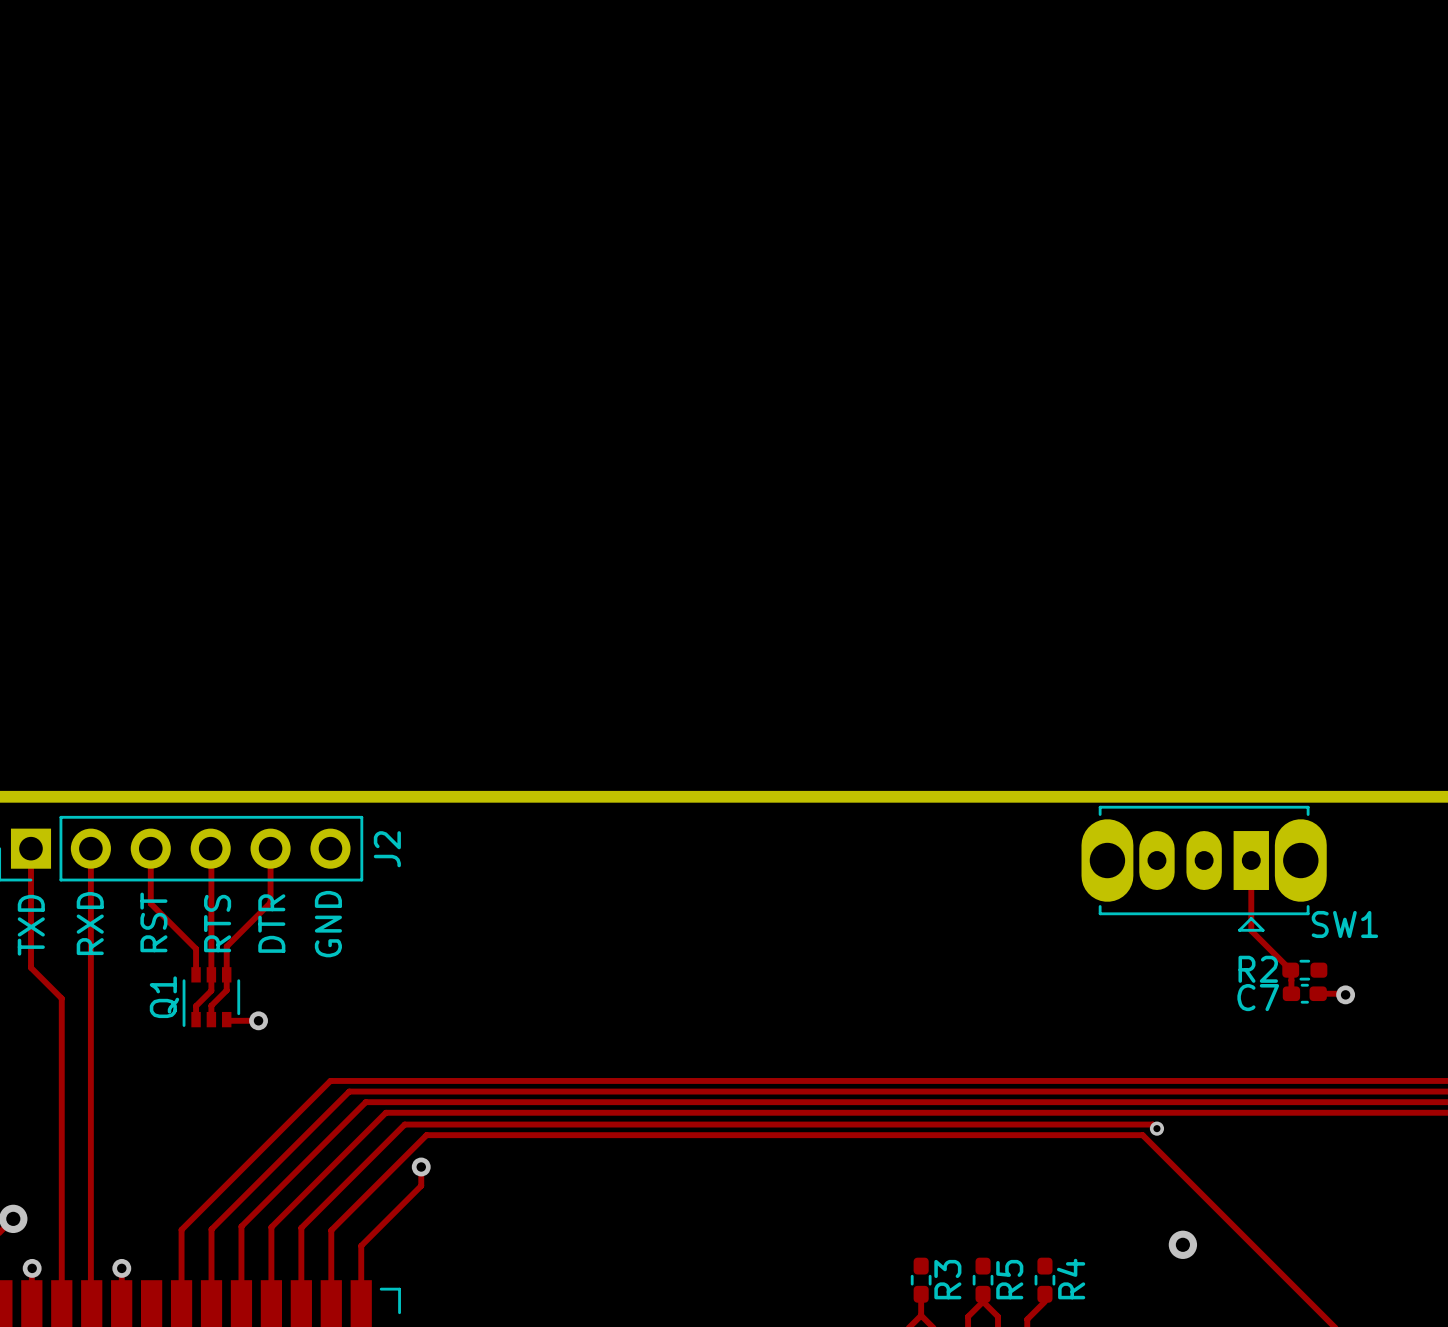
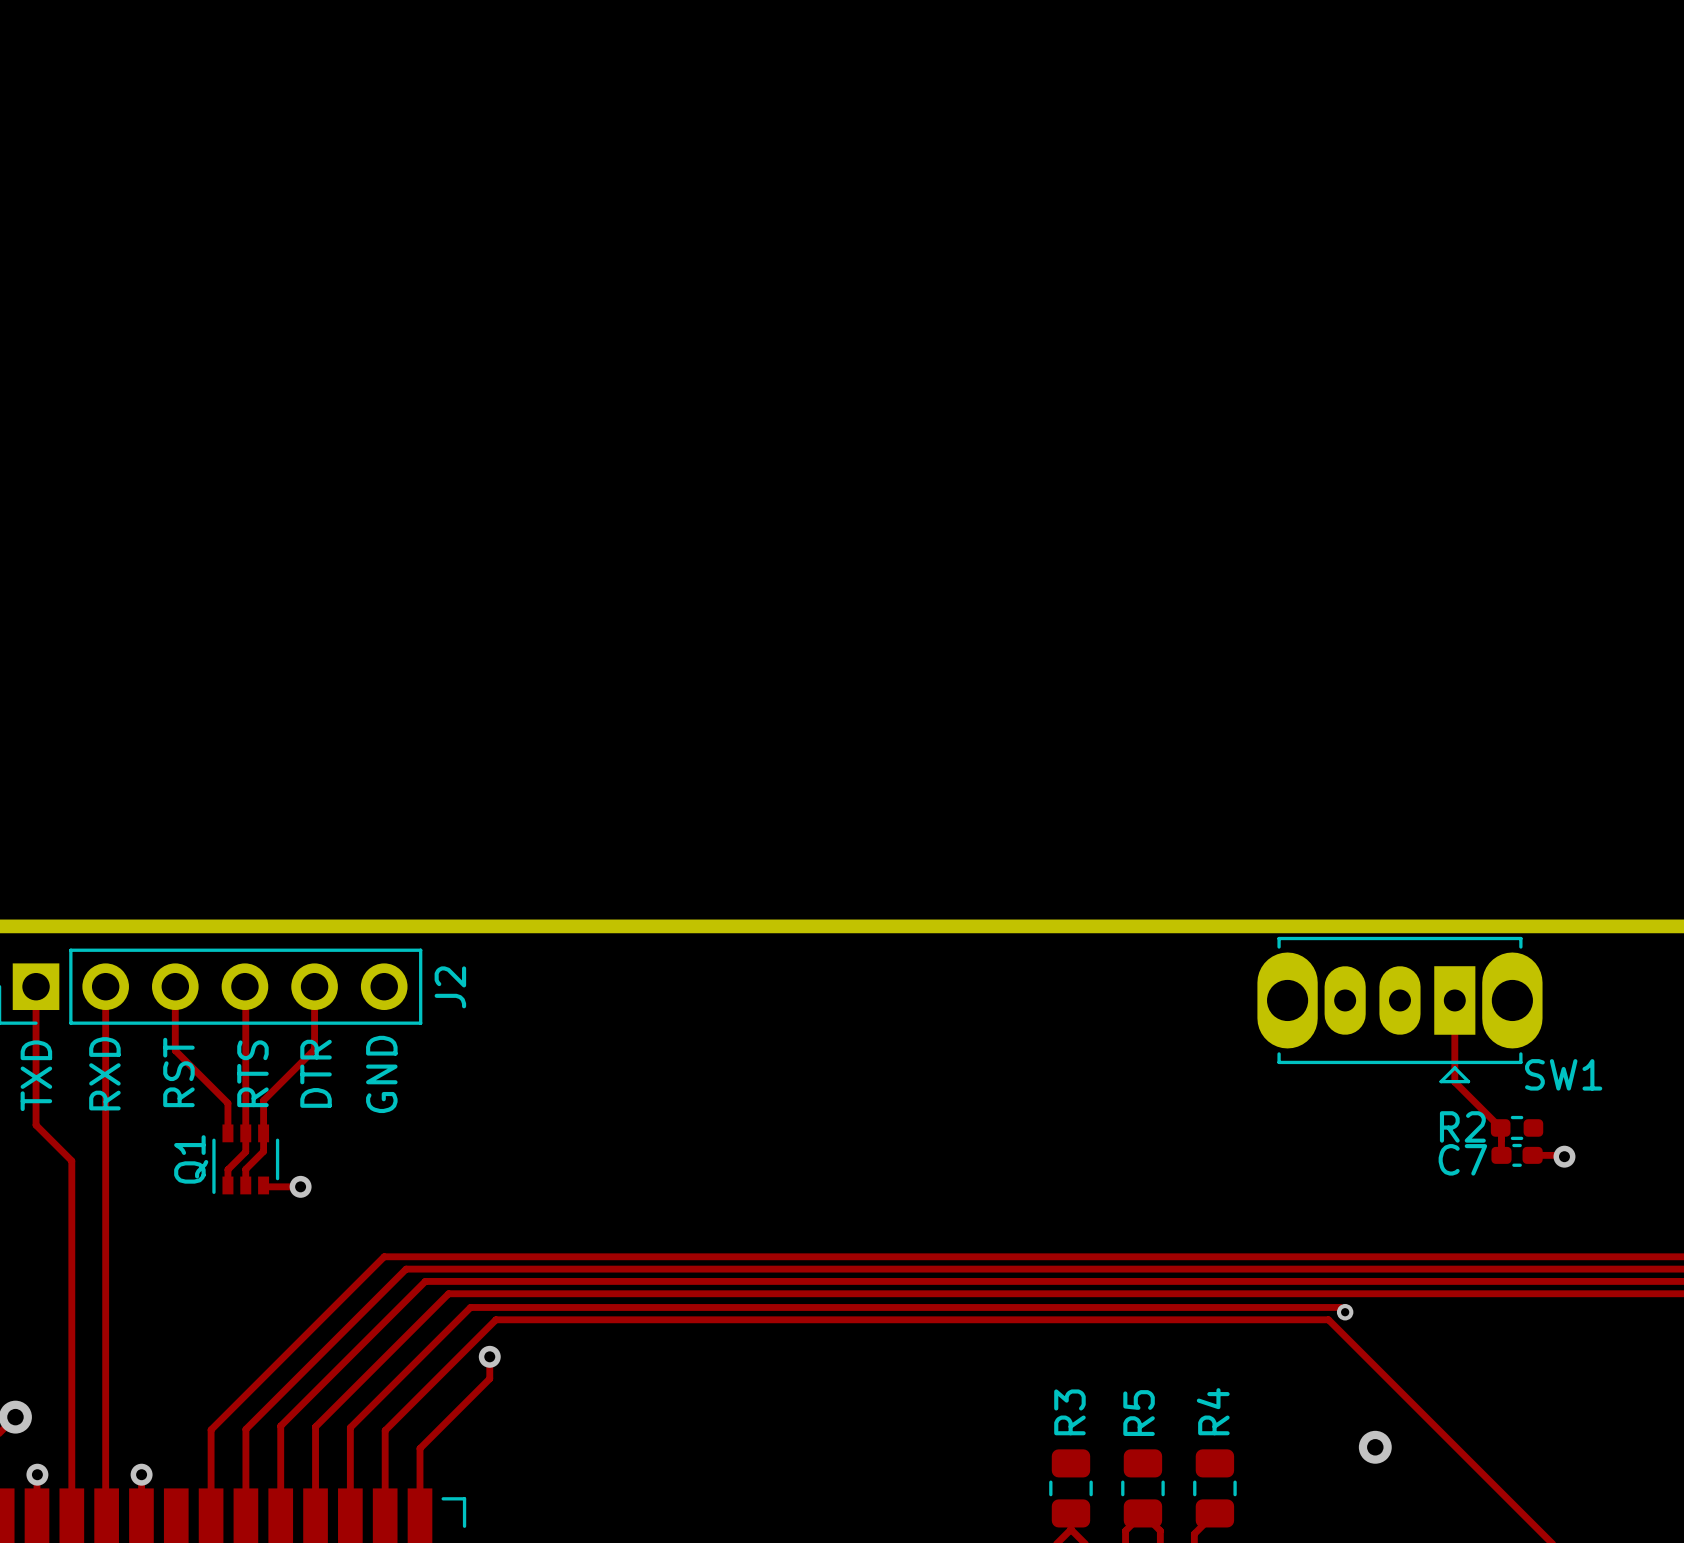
R3 footprint: [910, 1257, 932, 1303] -> [1049, 1449, 1093, 1528]
R5 footprint: [972, 1257, 994, 1303] -> [1121, 1449, 1165, 1528]
R4 footprint: [1034, 1257, 1056, 1303] -> [1193, 1449, 1237, 1528]
R3 name position: R3 (947, 1279) -> R3 (1069, 1412)
R5 name position: R5 (1009, 1279) -> R5 (1139, 1413)
R4 name position: R4 (1071, 1279) -> R4 (1213, 1411)

